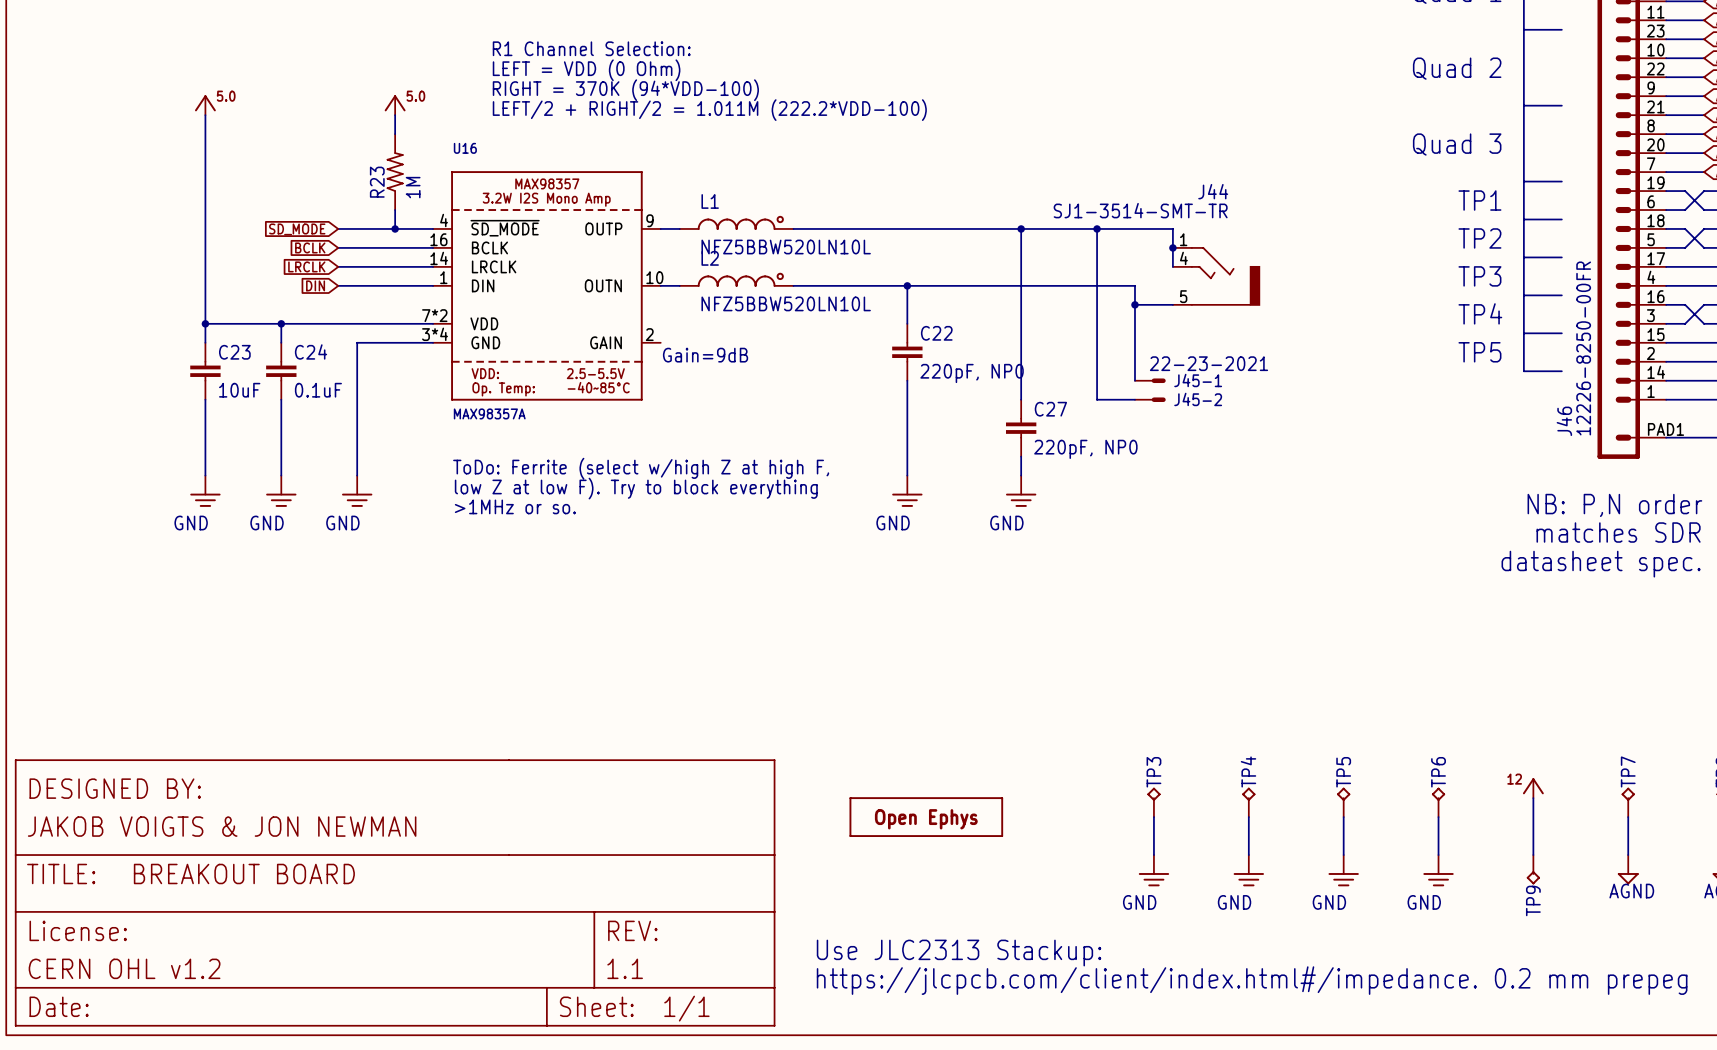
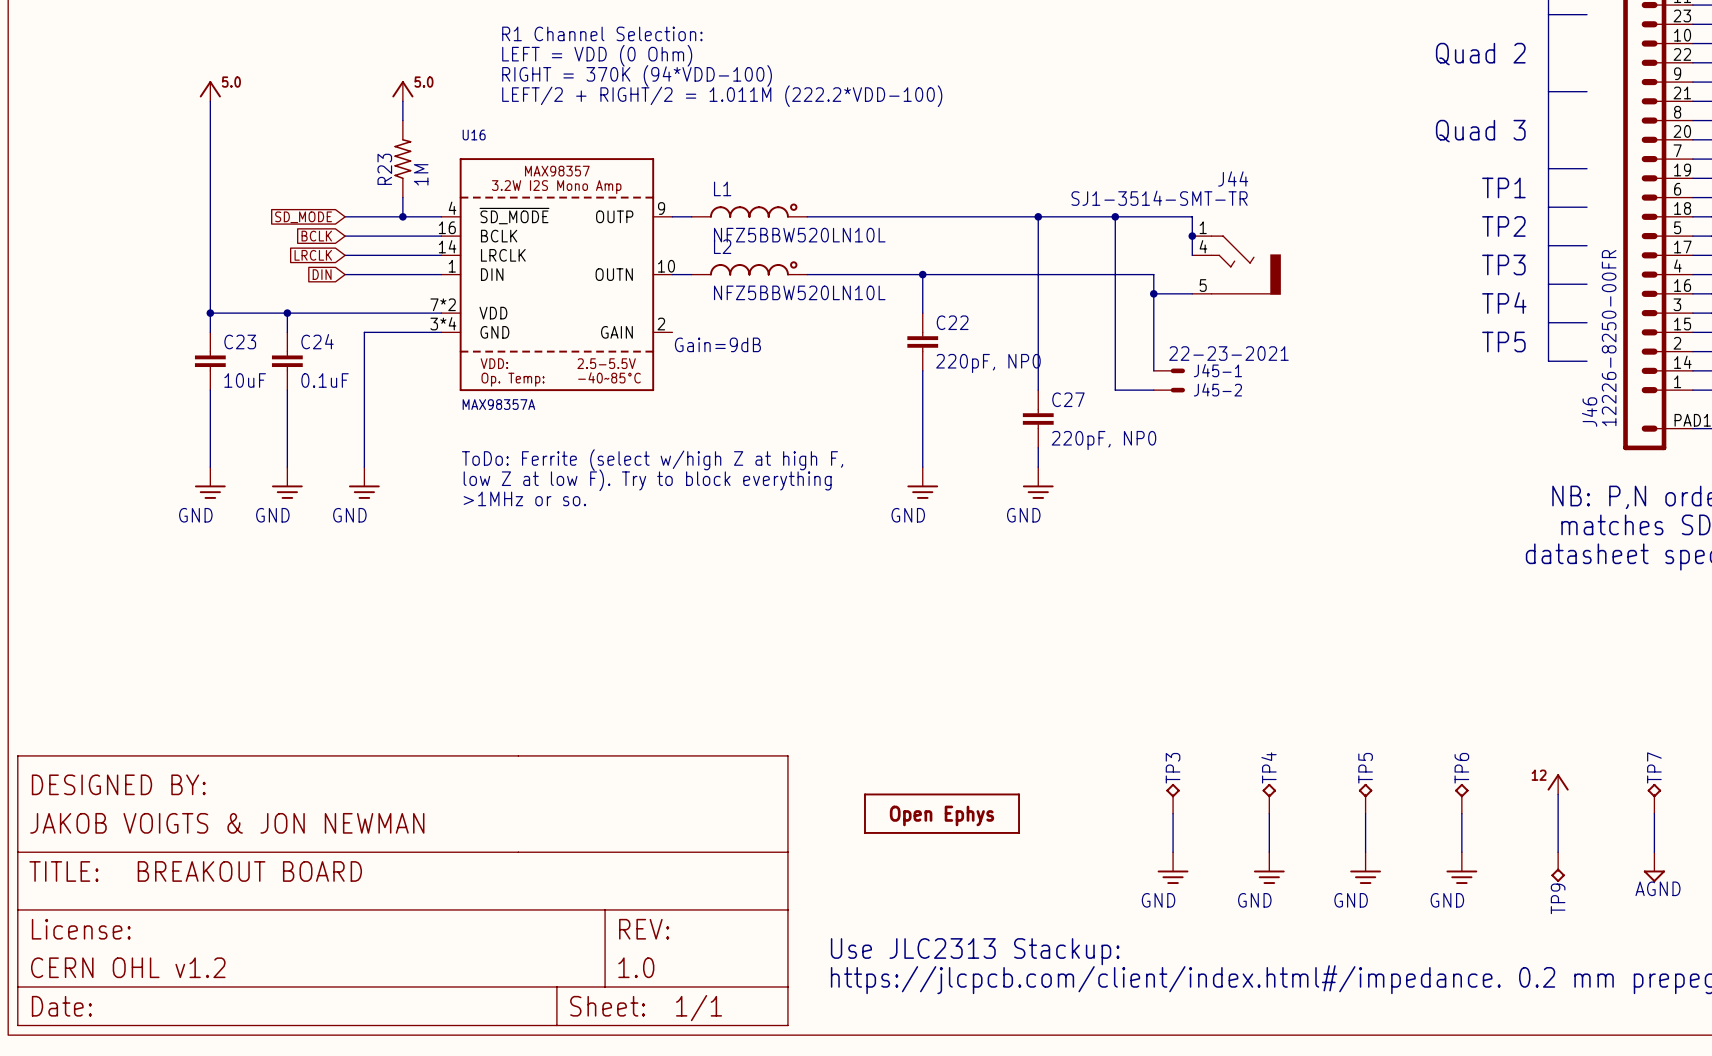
part text: 1.1 (625, 968) -> 1.0 (636, 967)

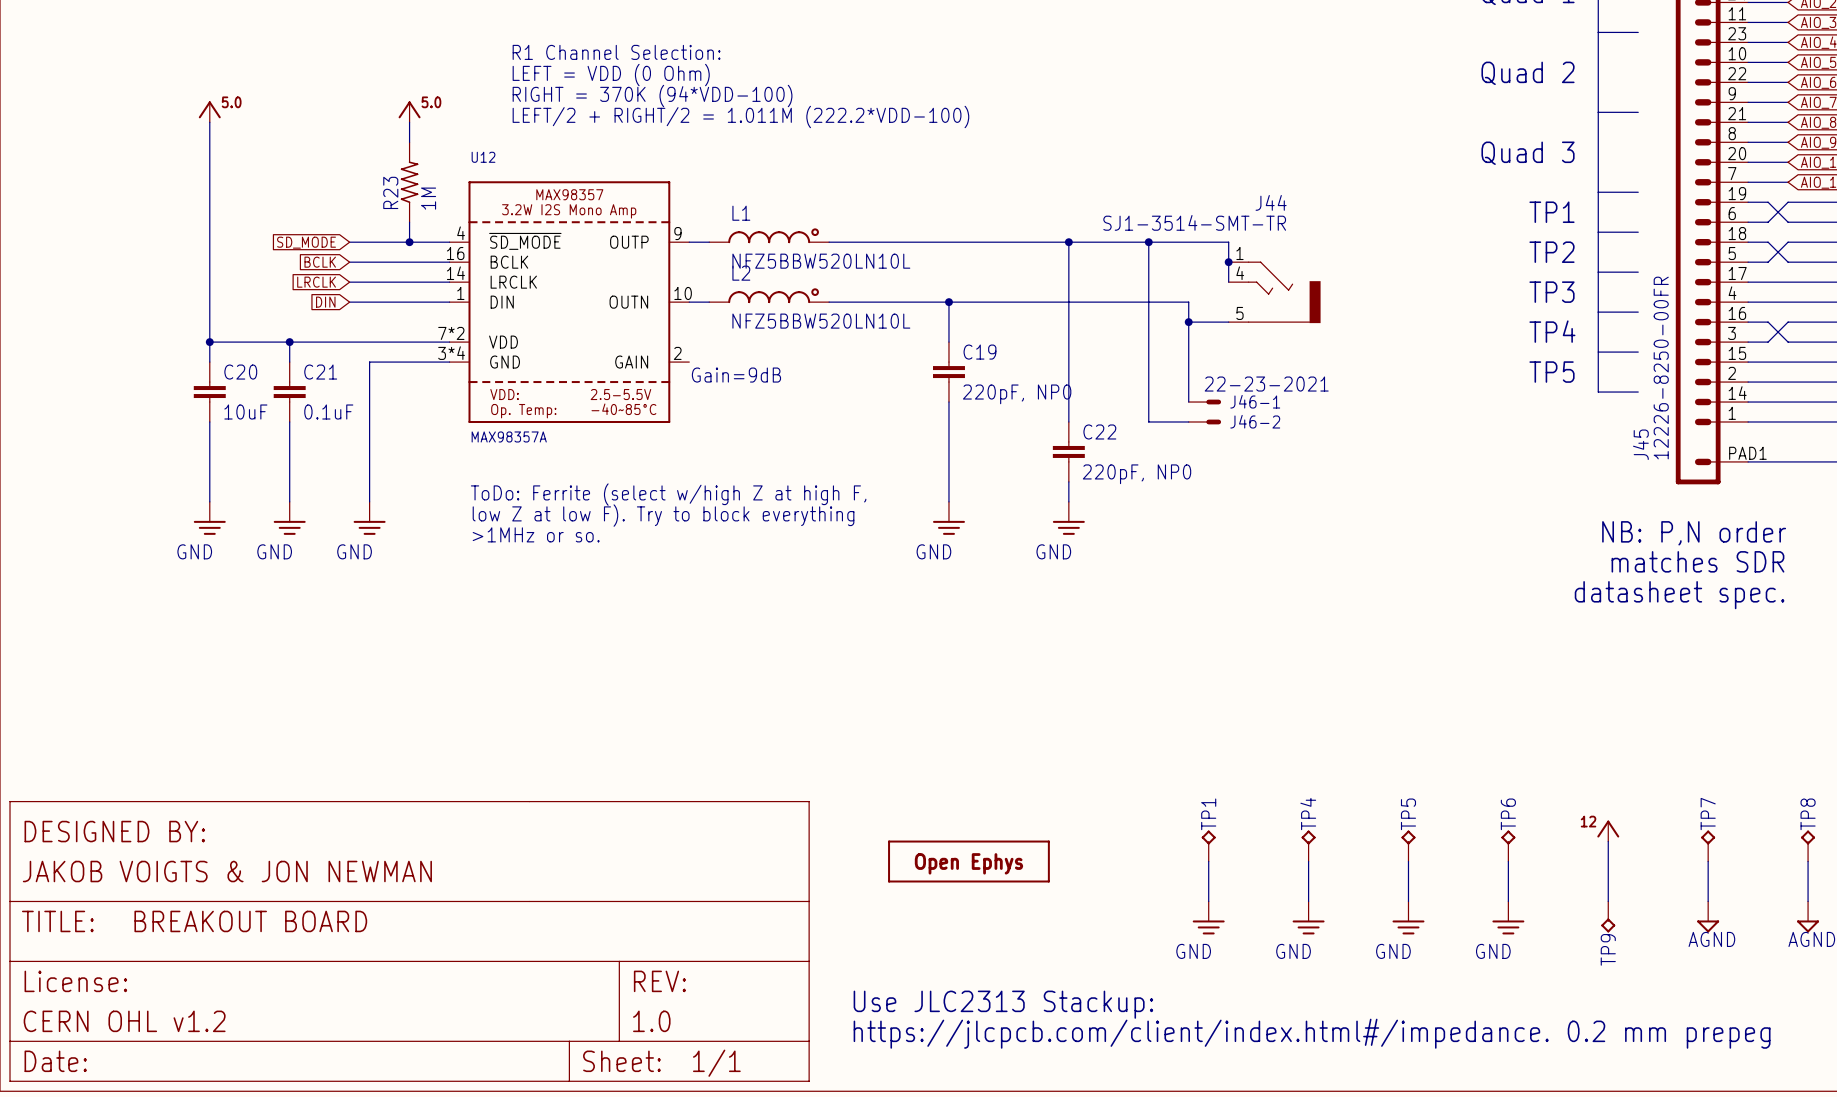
U16 name: U16 (474, 135) -> U12 (483, 157)
C22 name: C22 (952, 322) -> C19 (979, 352)
C23 name: C23 (240, 341) -> C20 (240, 372)
C24 name: C24 (317, 341) -> C21 (320, 372)
J45-1 name: J45-1 (1217, 370) -> J46-1 (1255, 401)
J45-2 name: J45-2 (1217, 389) -> J46-2 (1255, 421)
C27 name: C27 (1068, 399) -> C22 (1099, 431)
J46 name: J46 (1589, 412) -> J45 (1640, 444)
TP3 name: TP3 (1173, 768) -> TP1 (1208, 814)

